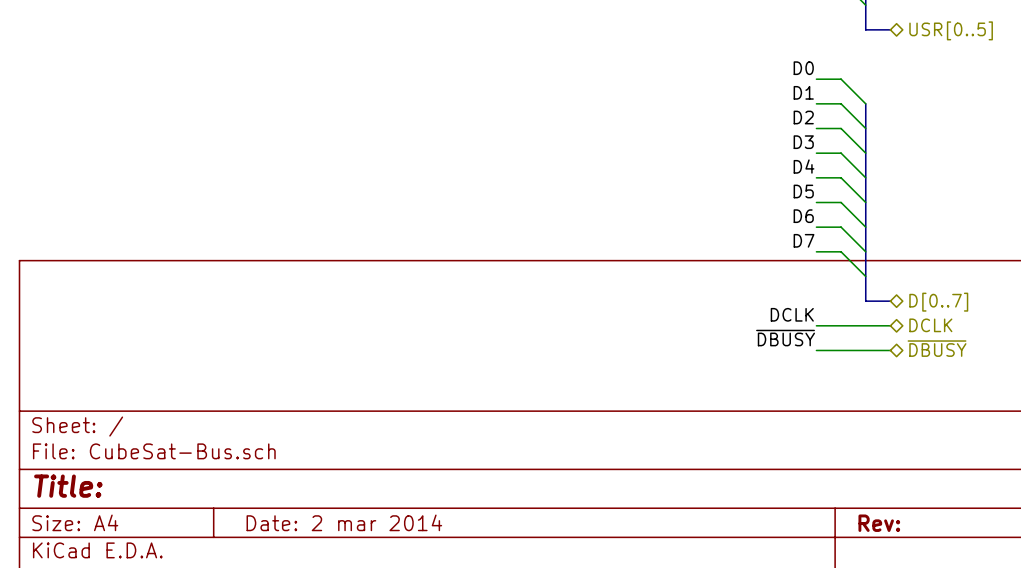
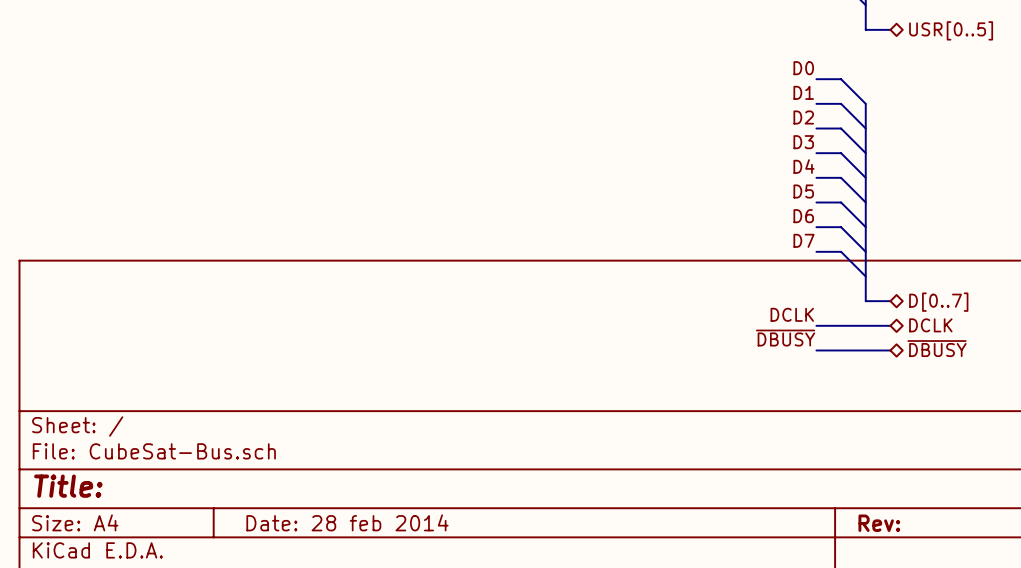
title block: Date: 2 mar 2014 (344, 522) -> Date: 28 feb 2014 (347, 522)

